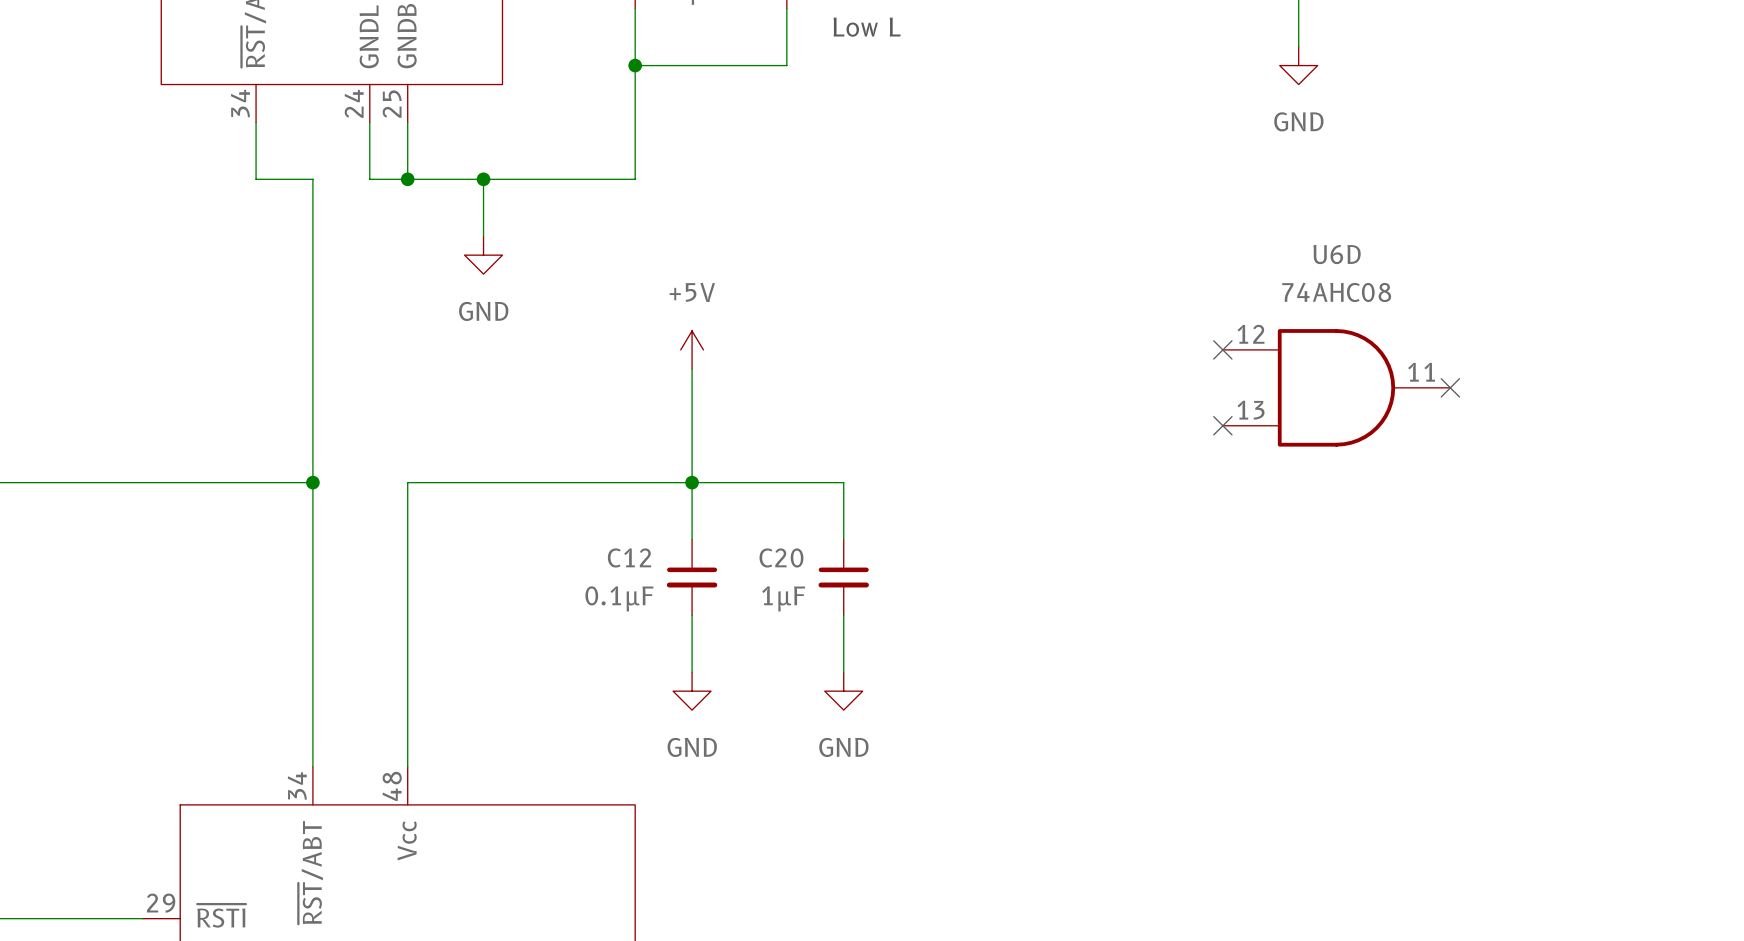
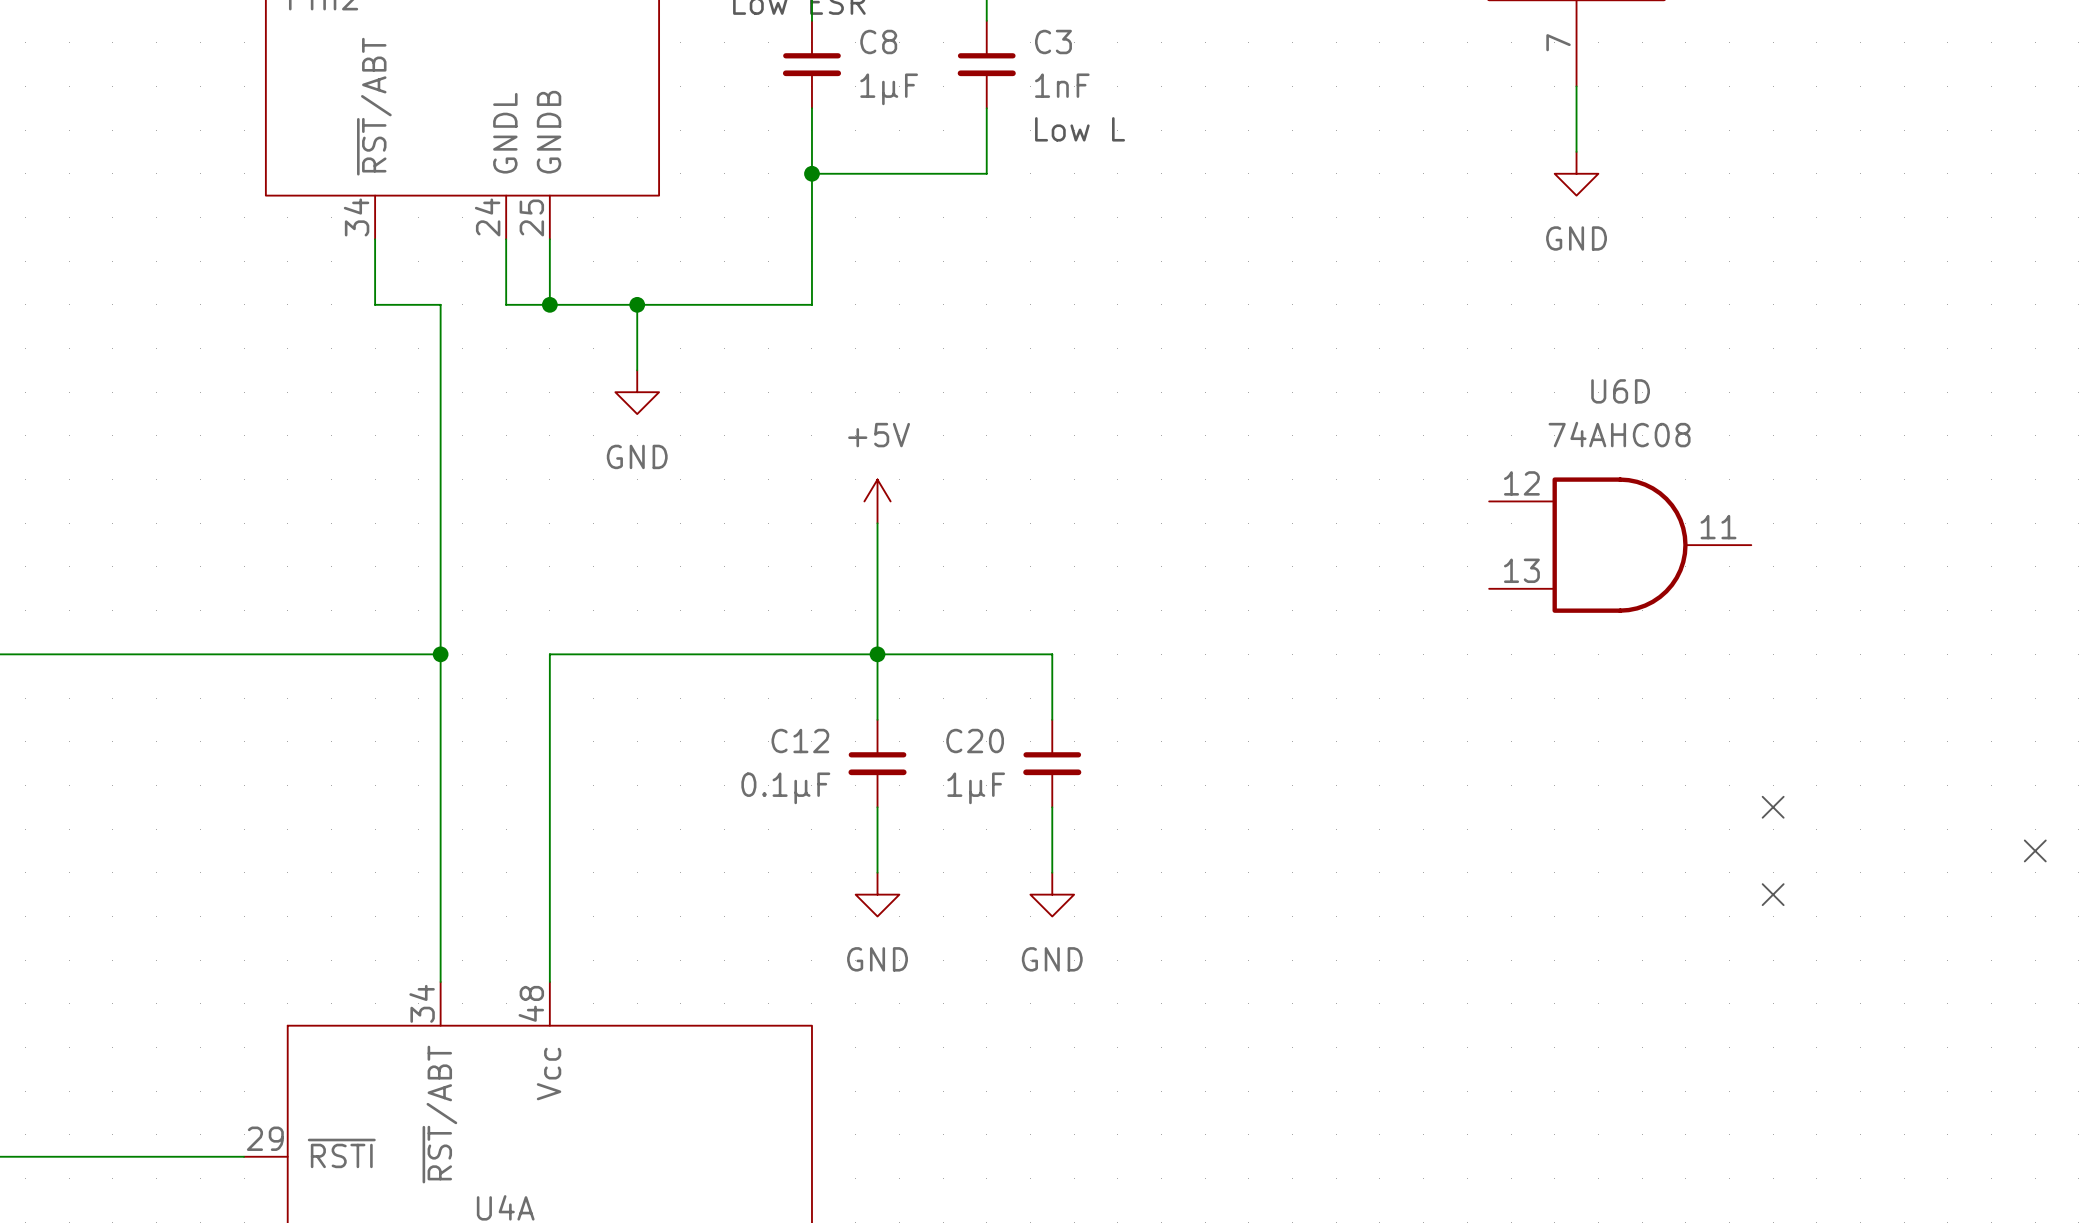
no-connect mark: (1222, 349) -> none
no-connect mark: (1450, 387) -> none
no-connect mark: (1222, 425) -> none
no-connect mark: none -> (1773, 807)
no-connect mark: none -> (2035, 850)
no-connect mark: none -> (1773, 894)

